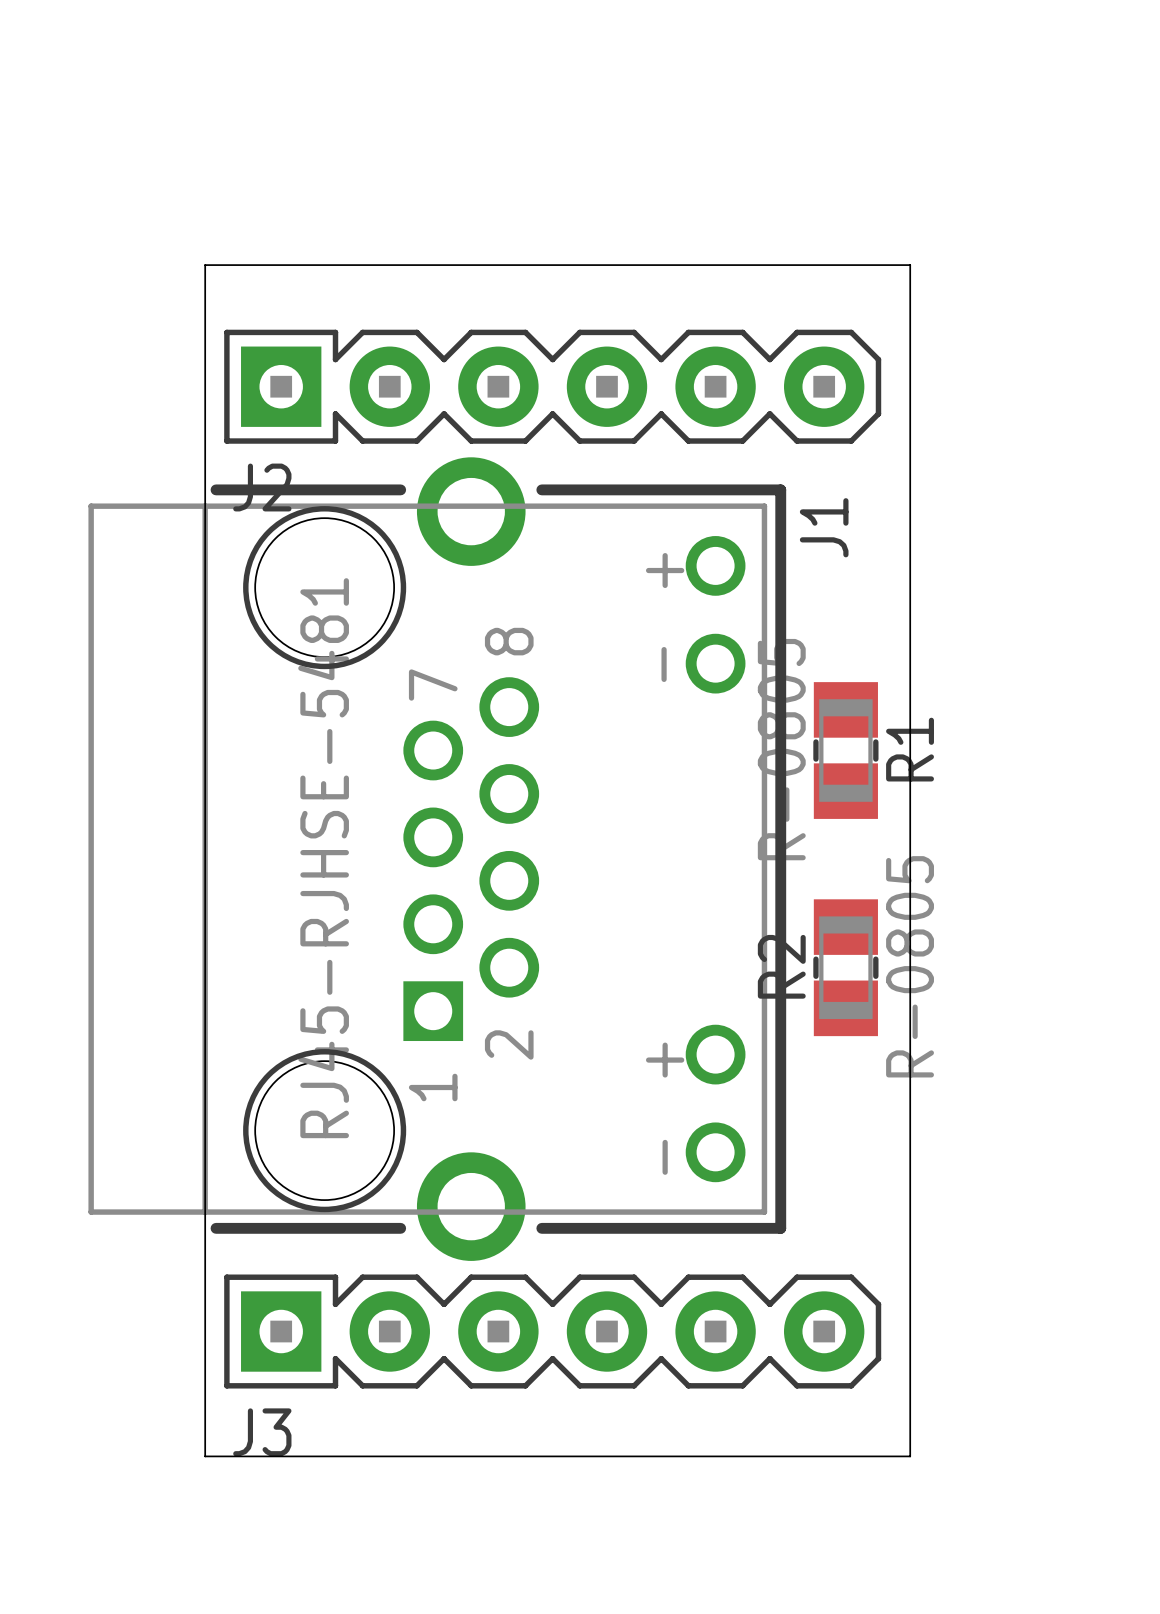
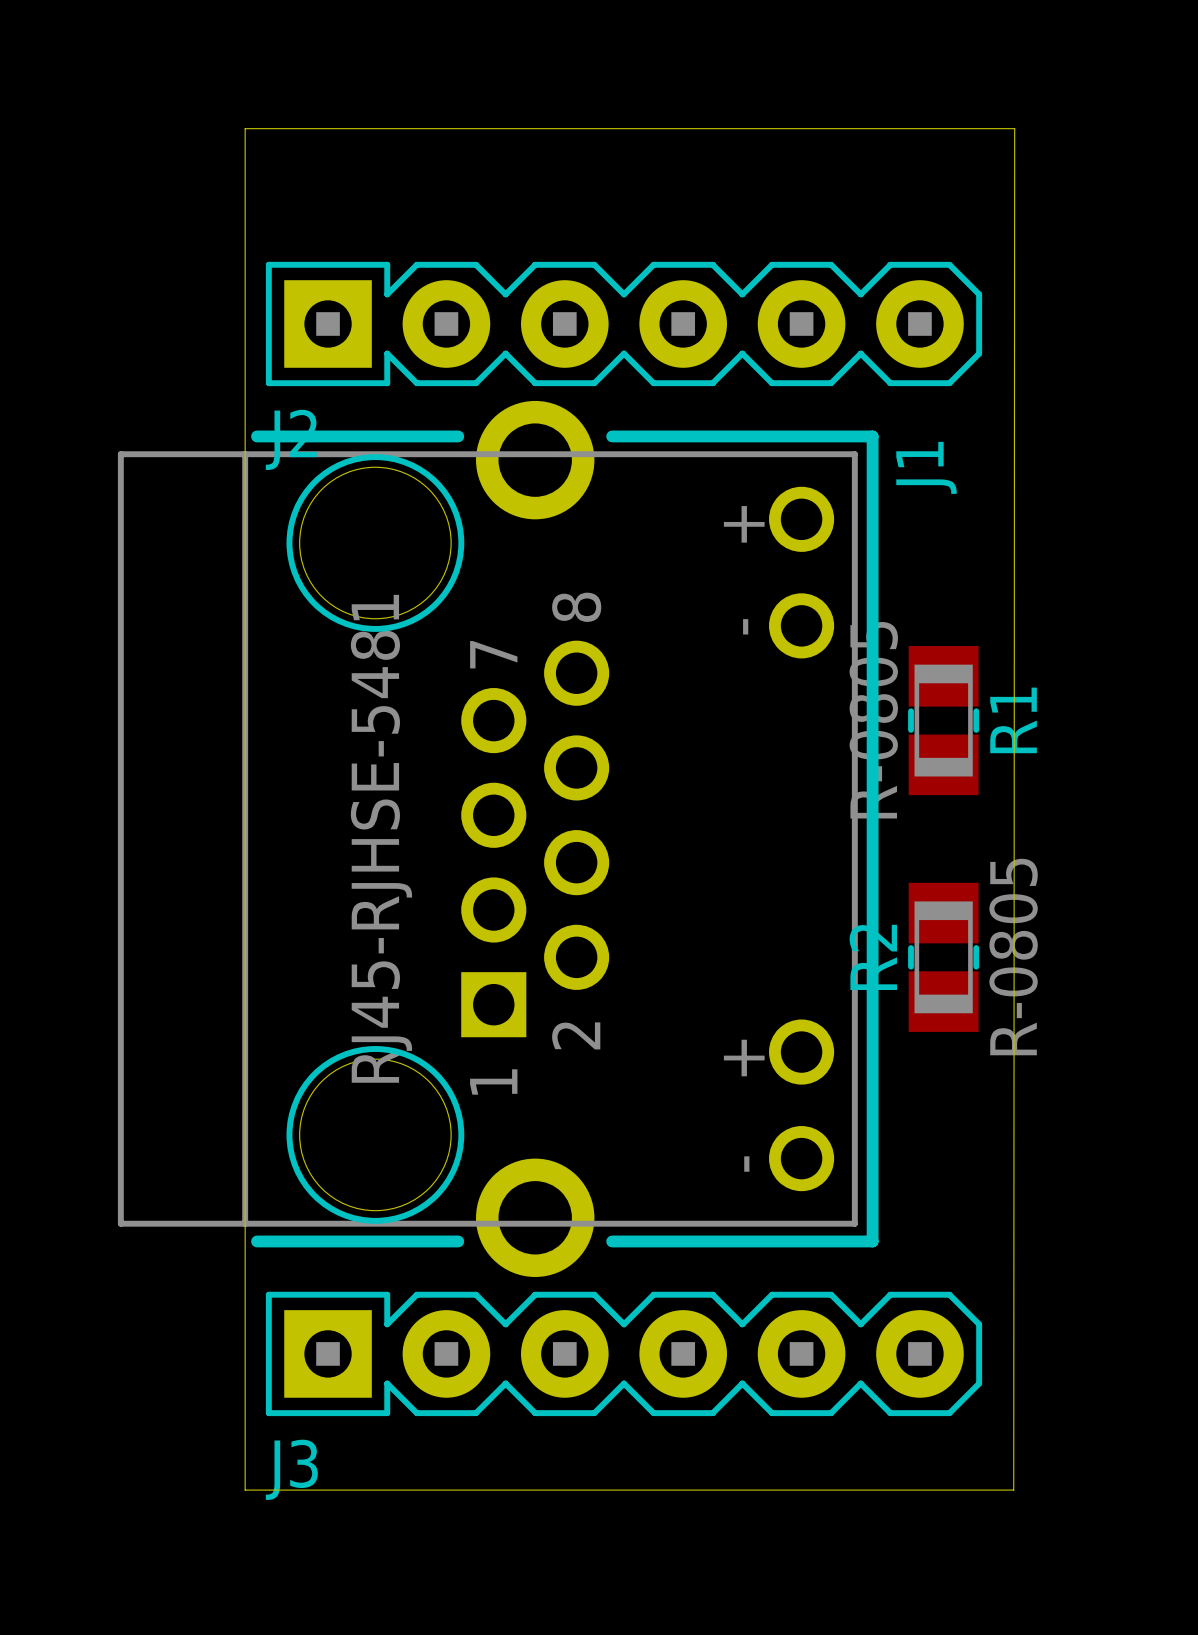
board edge: (205, 265) (910, 265) (910, 1456) -> (245, 191) (245, 128) (1014, 128) (1013, 1490)

